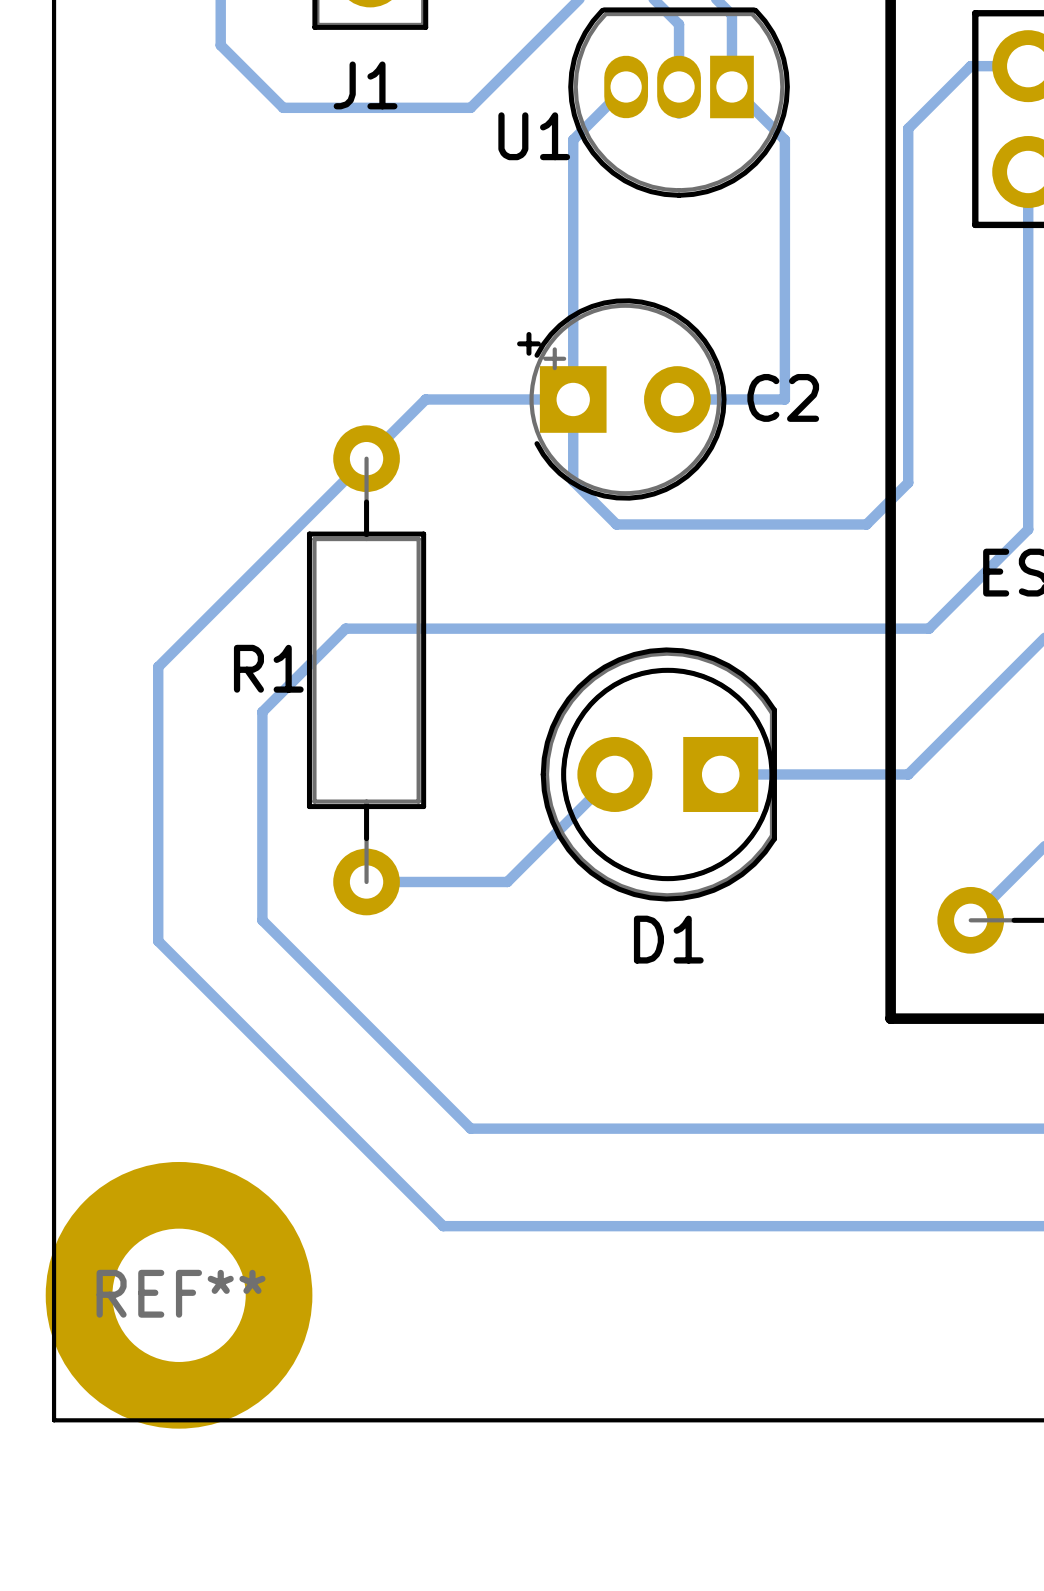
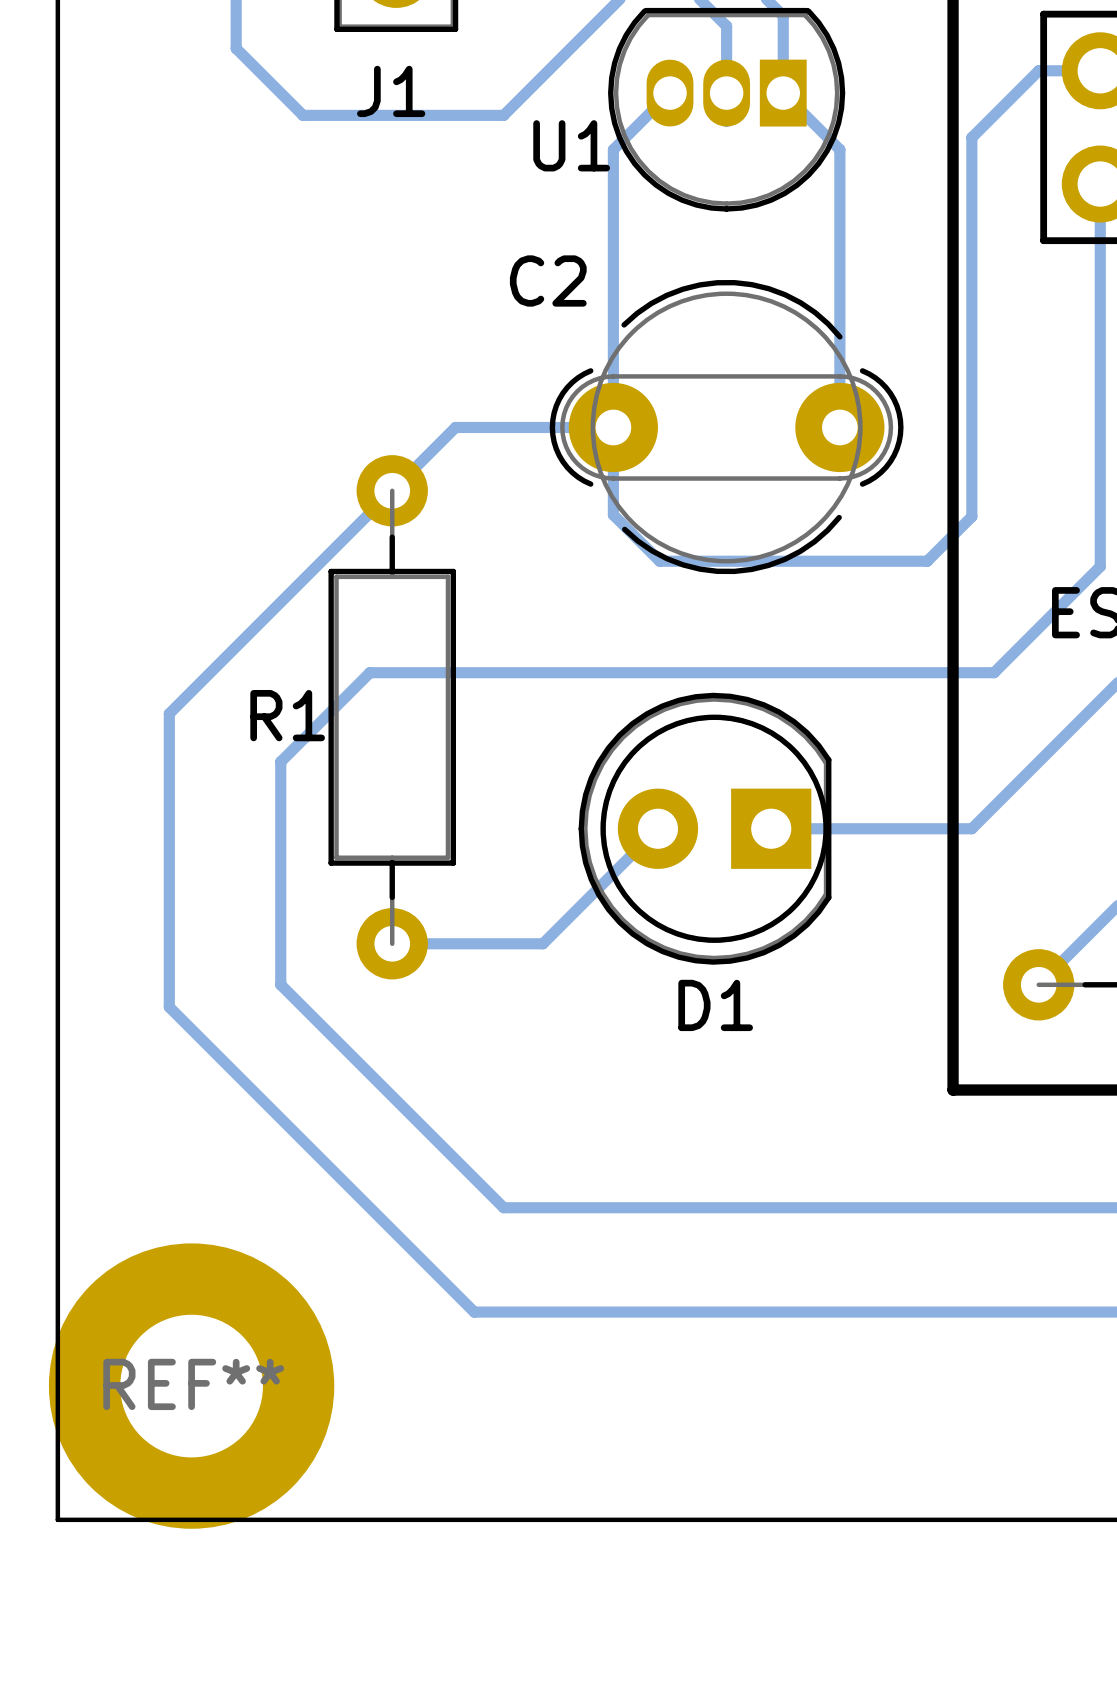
C2 footprint: [517, 298, 727, 501] -> [549, 279, 904, 575]
C2 name position: C2 (783, 397) -> C2 (548, 281)
bottom track: (677, 399) (784, 399) -> none

